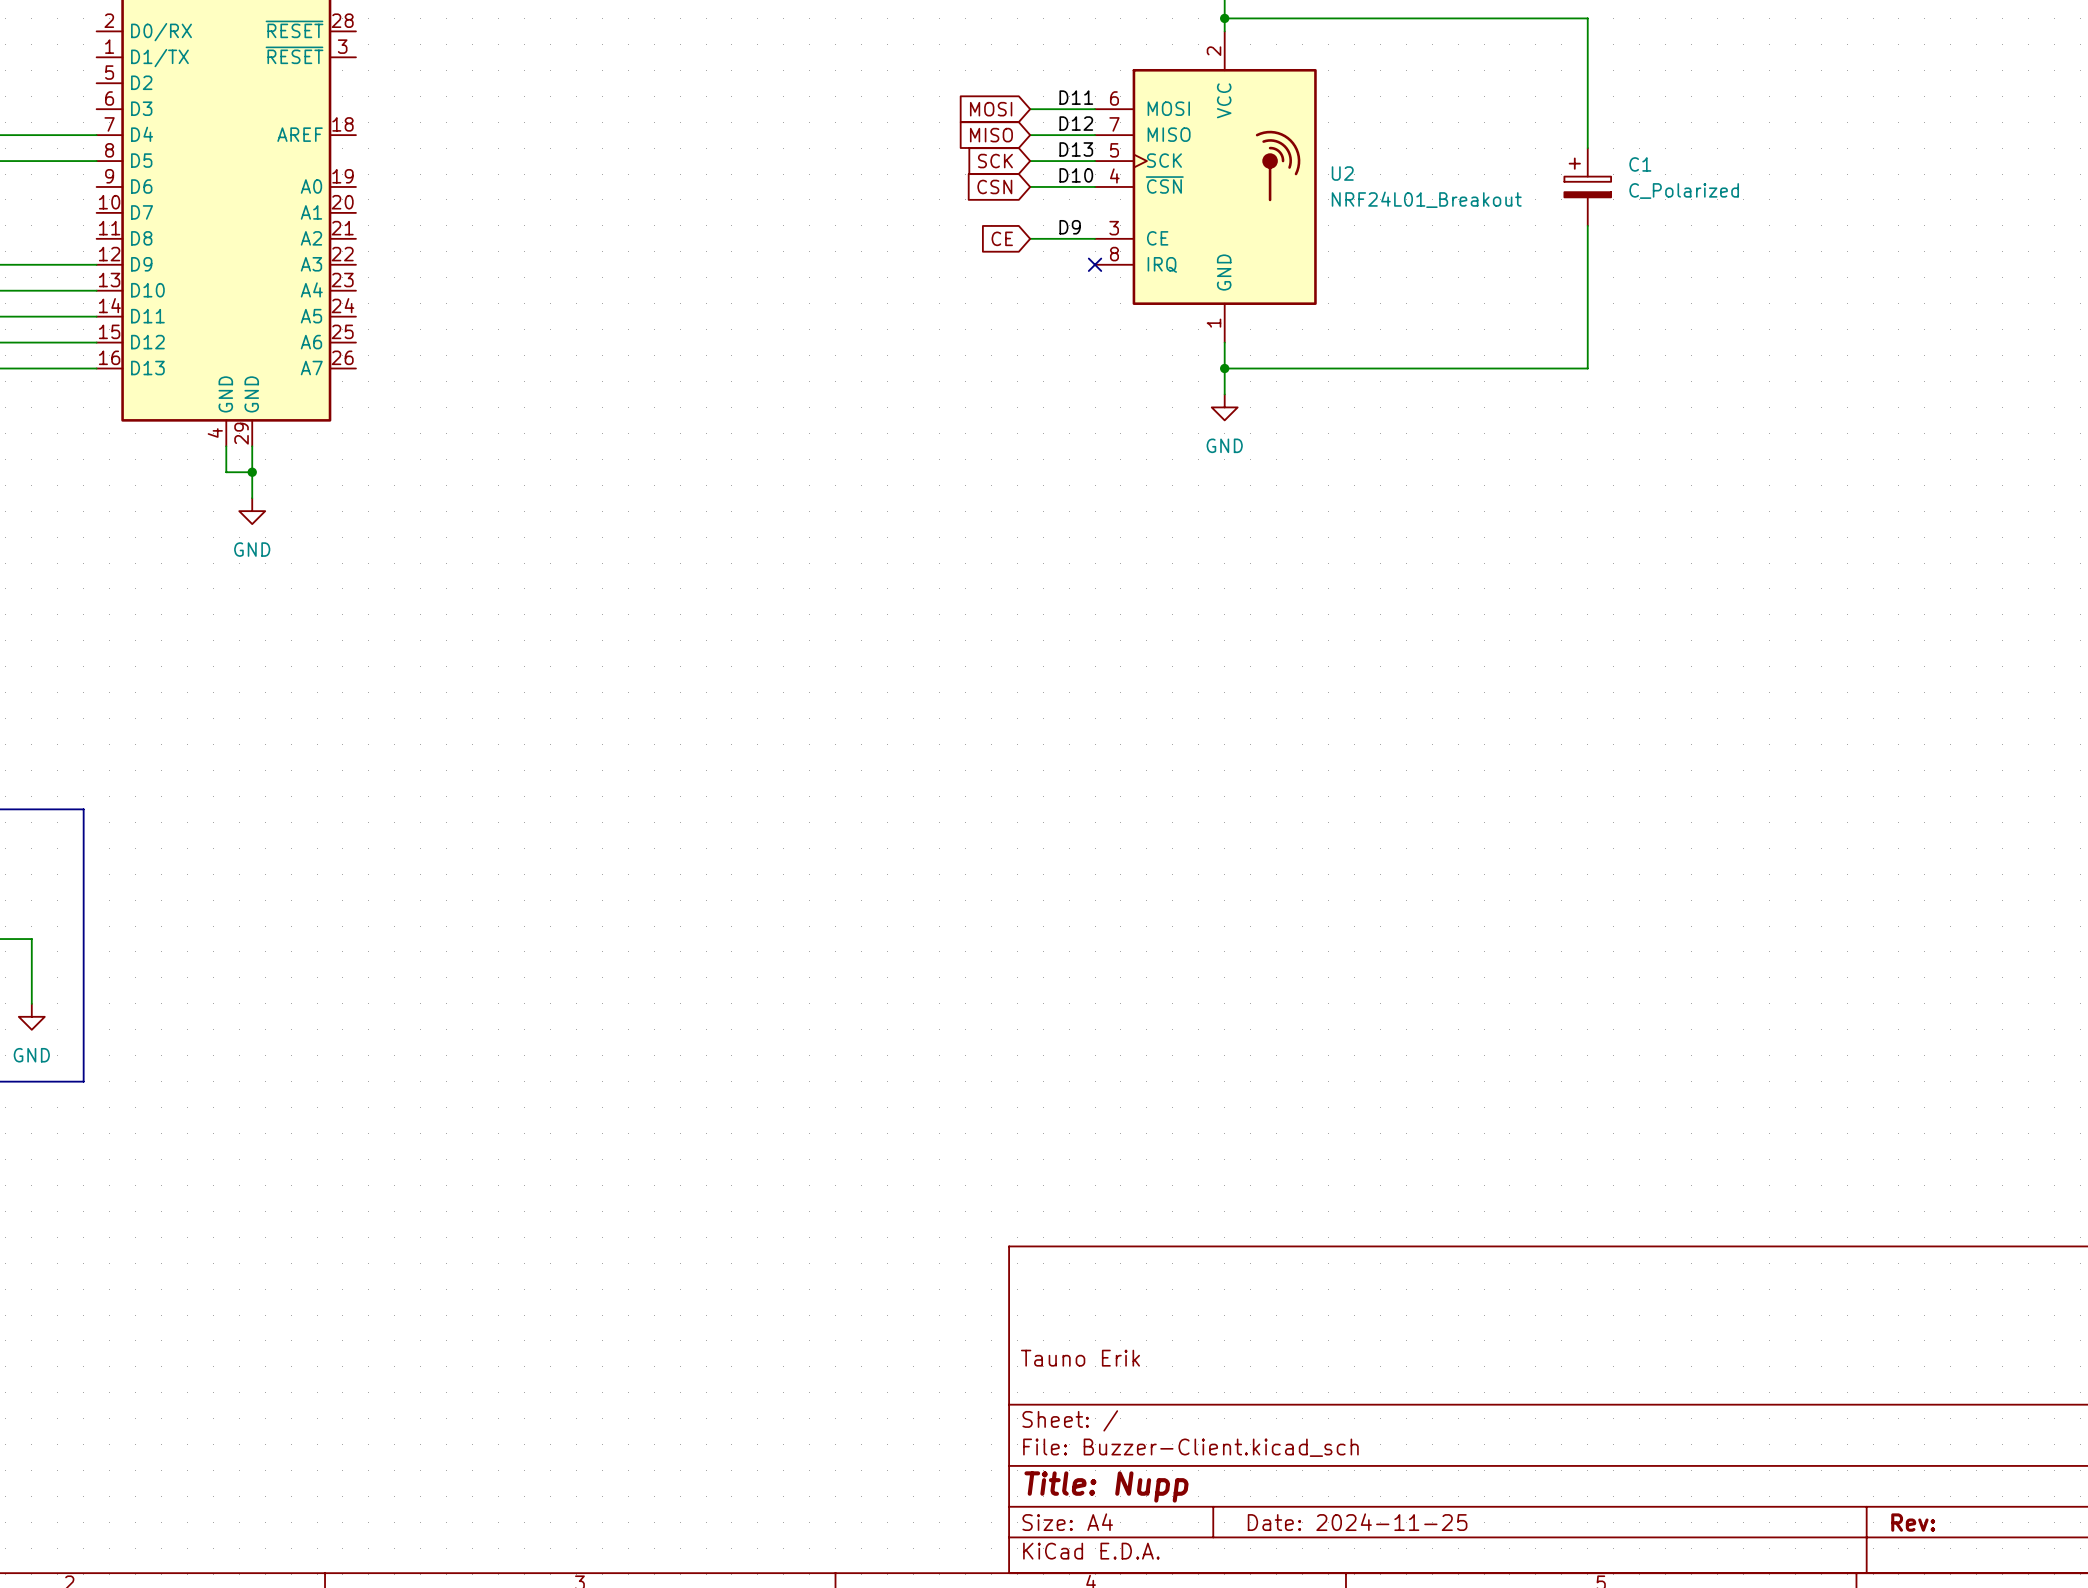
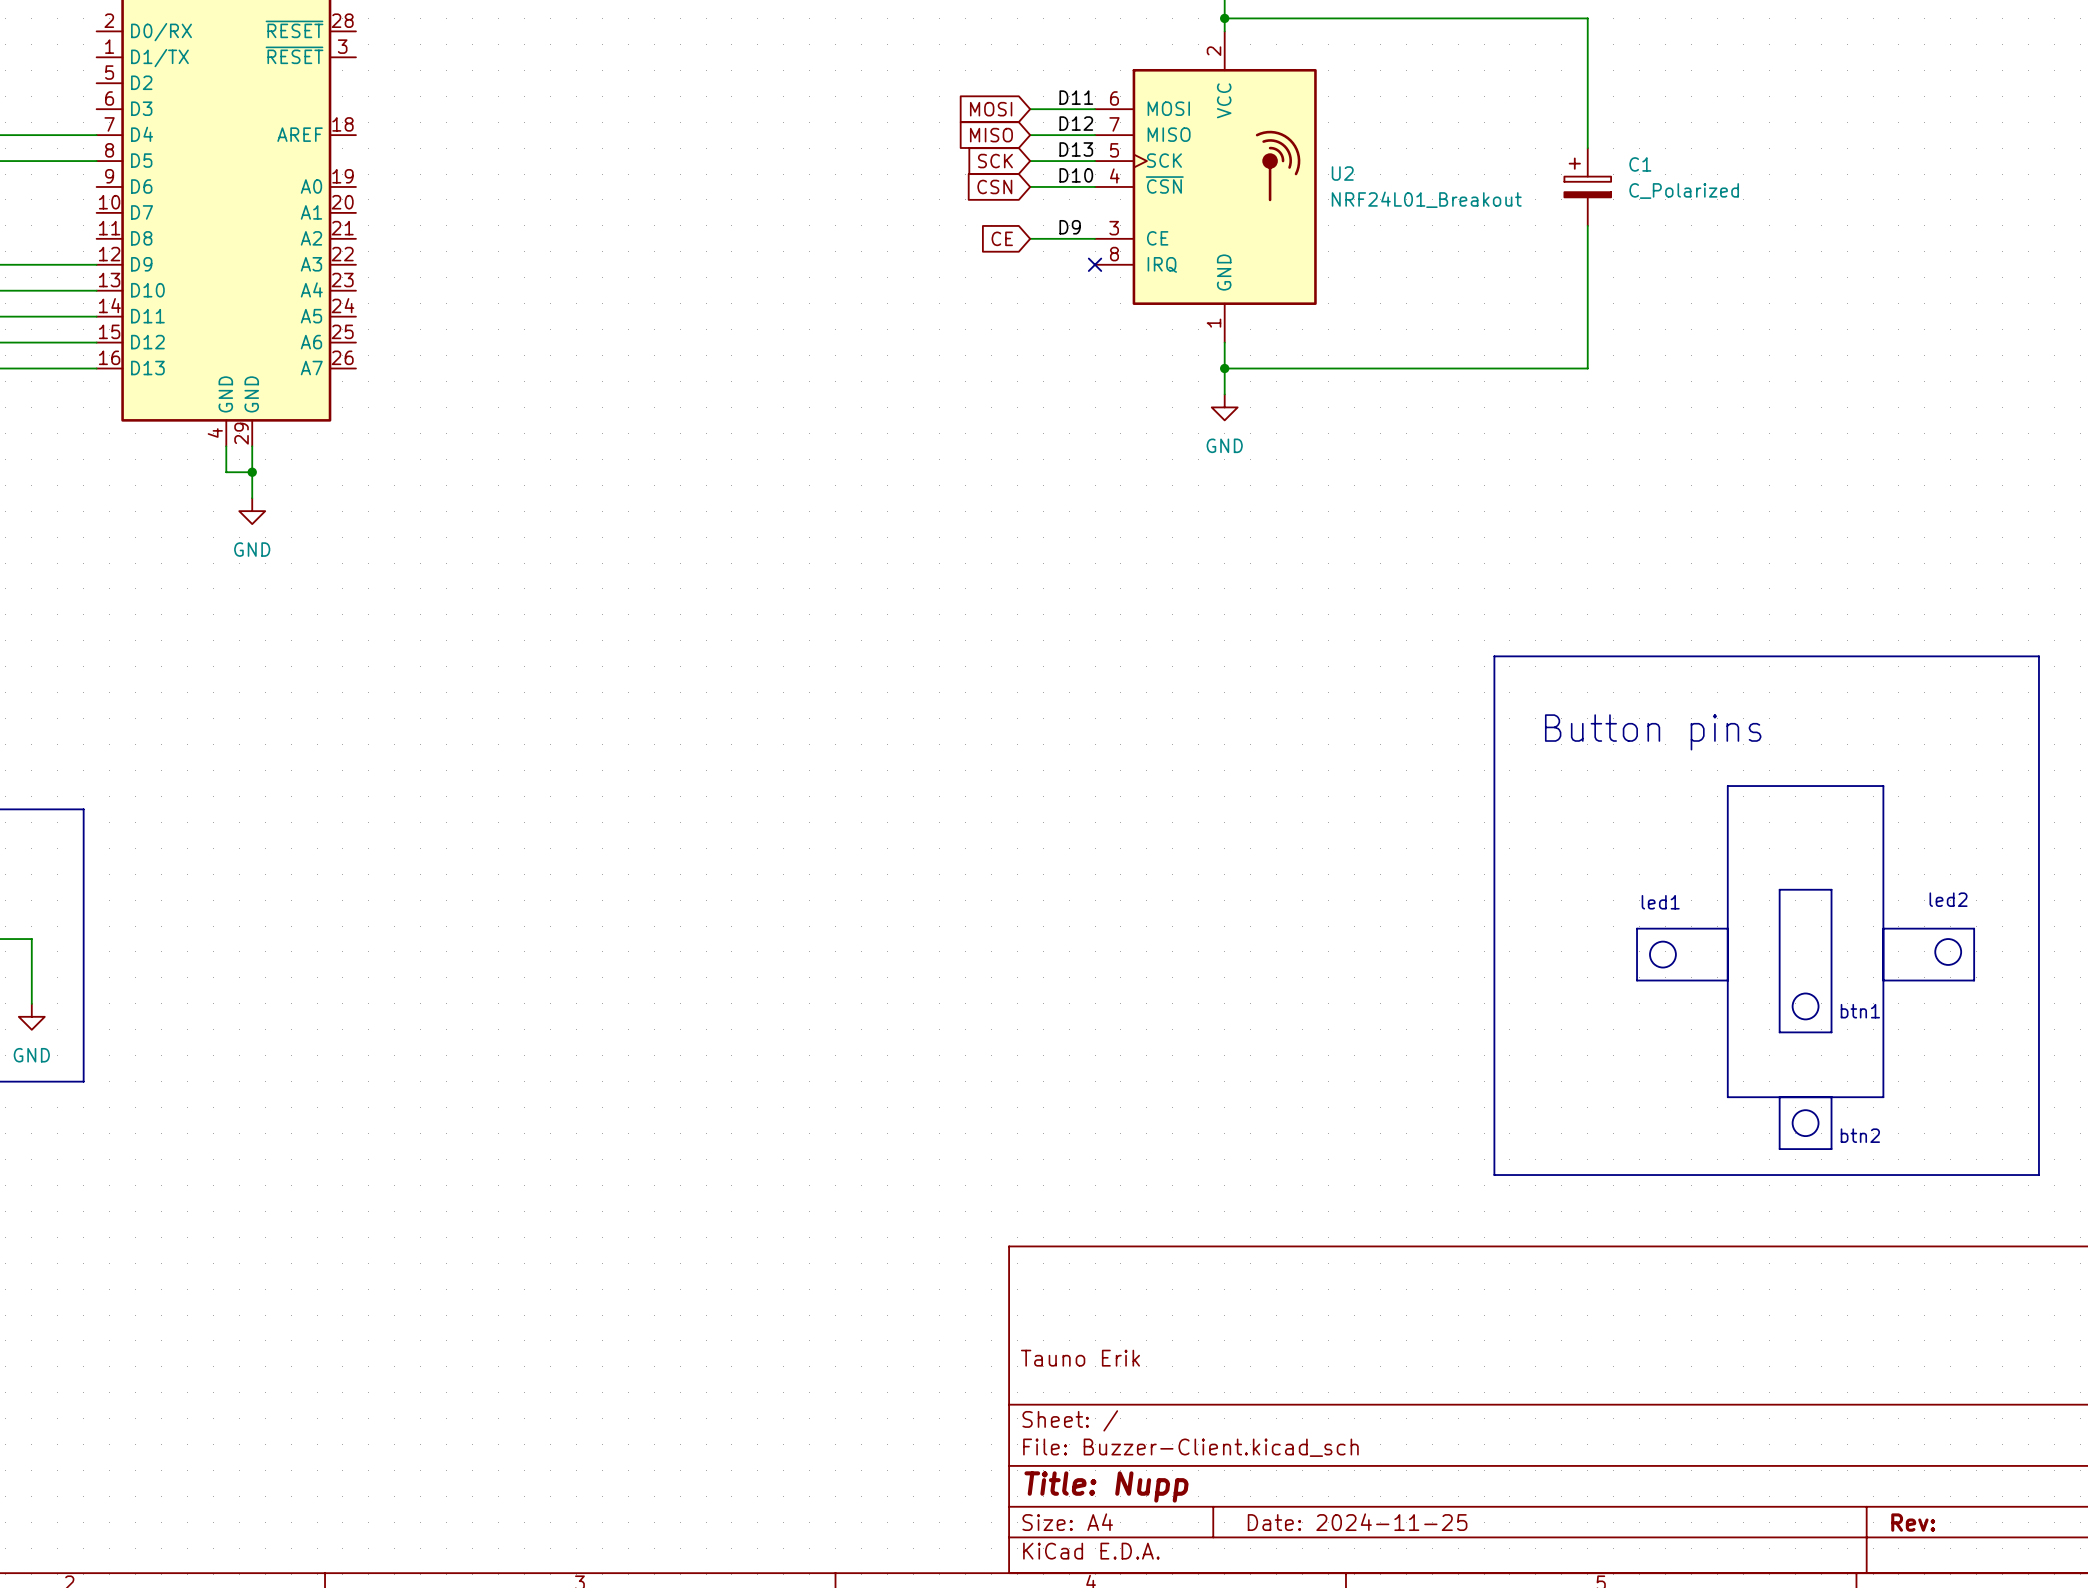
line: none -> (1494, 656) (2038, 656) (2038, 1175) (1494, 1175) (1494, 656)
text: none -> Button pins (1653, 732)
line: none -> (1727, 786) (1727, 1097) (1883, 1097) (1883, 786) (1727, 786)
line: none -> (1779, 889) (1779, 1032) (1831, 1032) (1831, 889) (1779, 889)
text: none -> led2 (1948, 899)
text: none -> led1 (1660, 902)
line: none -> (1727, 928) (1637, 928) (1637, 980) (1727, 980)
line: none -> (1883, 928) (1974, 928) (1974, 980) (1883, 980)
drawing: none -> [1935, 939, 1962, 965]
drawing: none -> [1649, 941, 1676, 968]
drawing: none -> [1792, 993, 1819, 1020]
text: none -> btn1 (1860, 1011)
line: none -> (1779, 1097) (1779, 1149) (1831, 1149) (1831, 1097)
drawing: none -> [1792, 1110, 1819, 1137]
text: none -> btn2 (1860, 1135)

